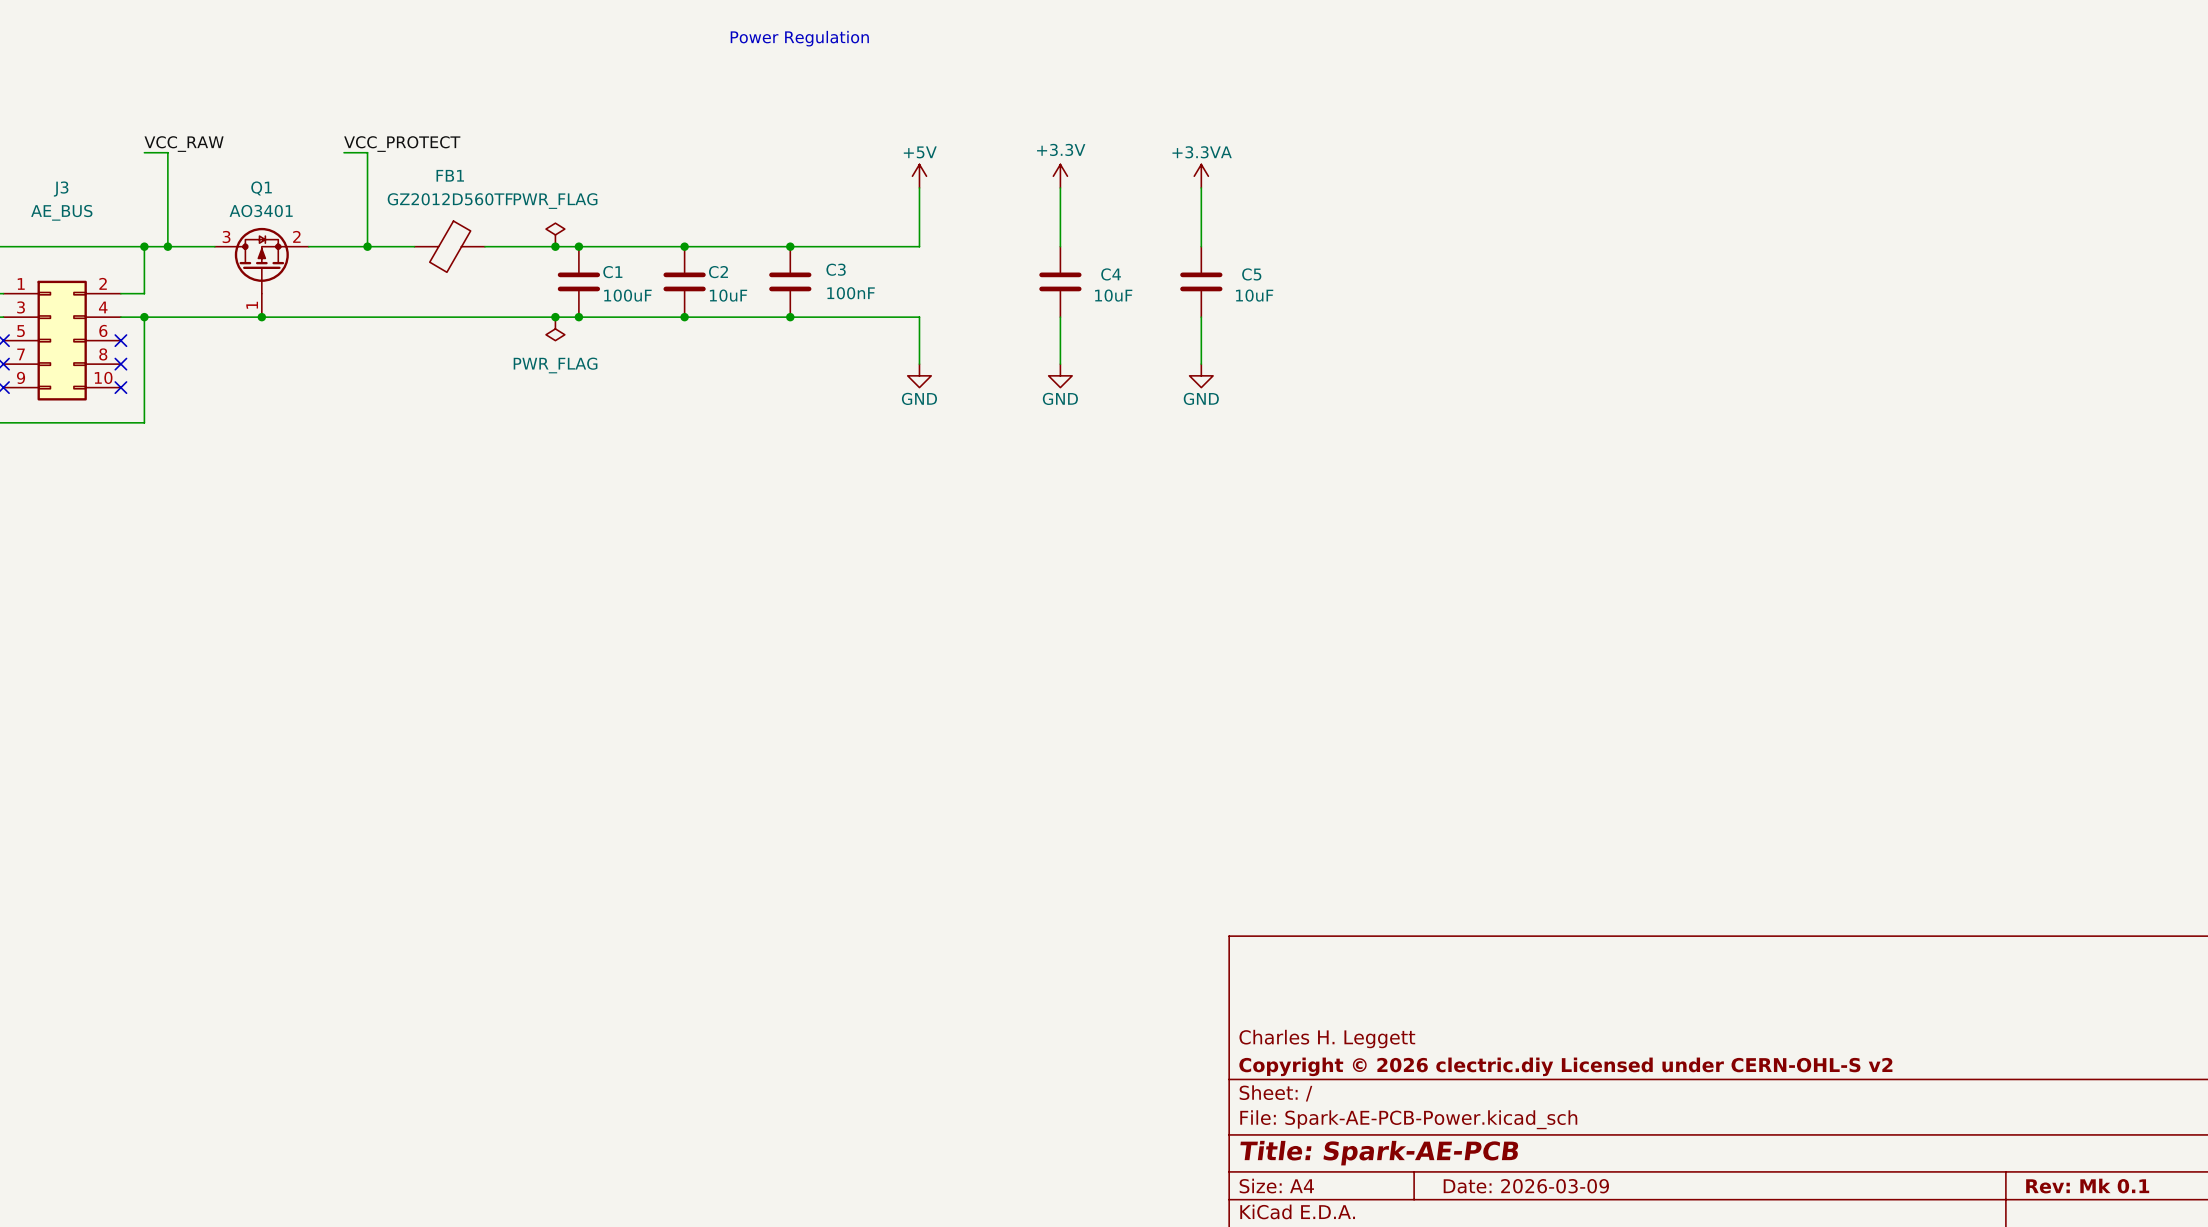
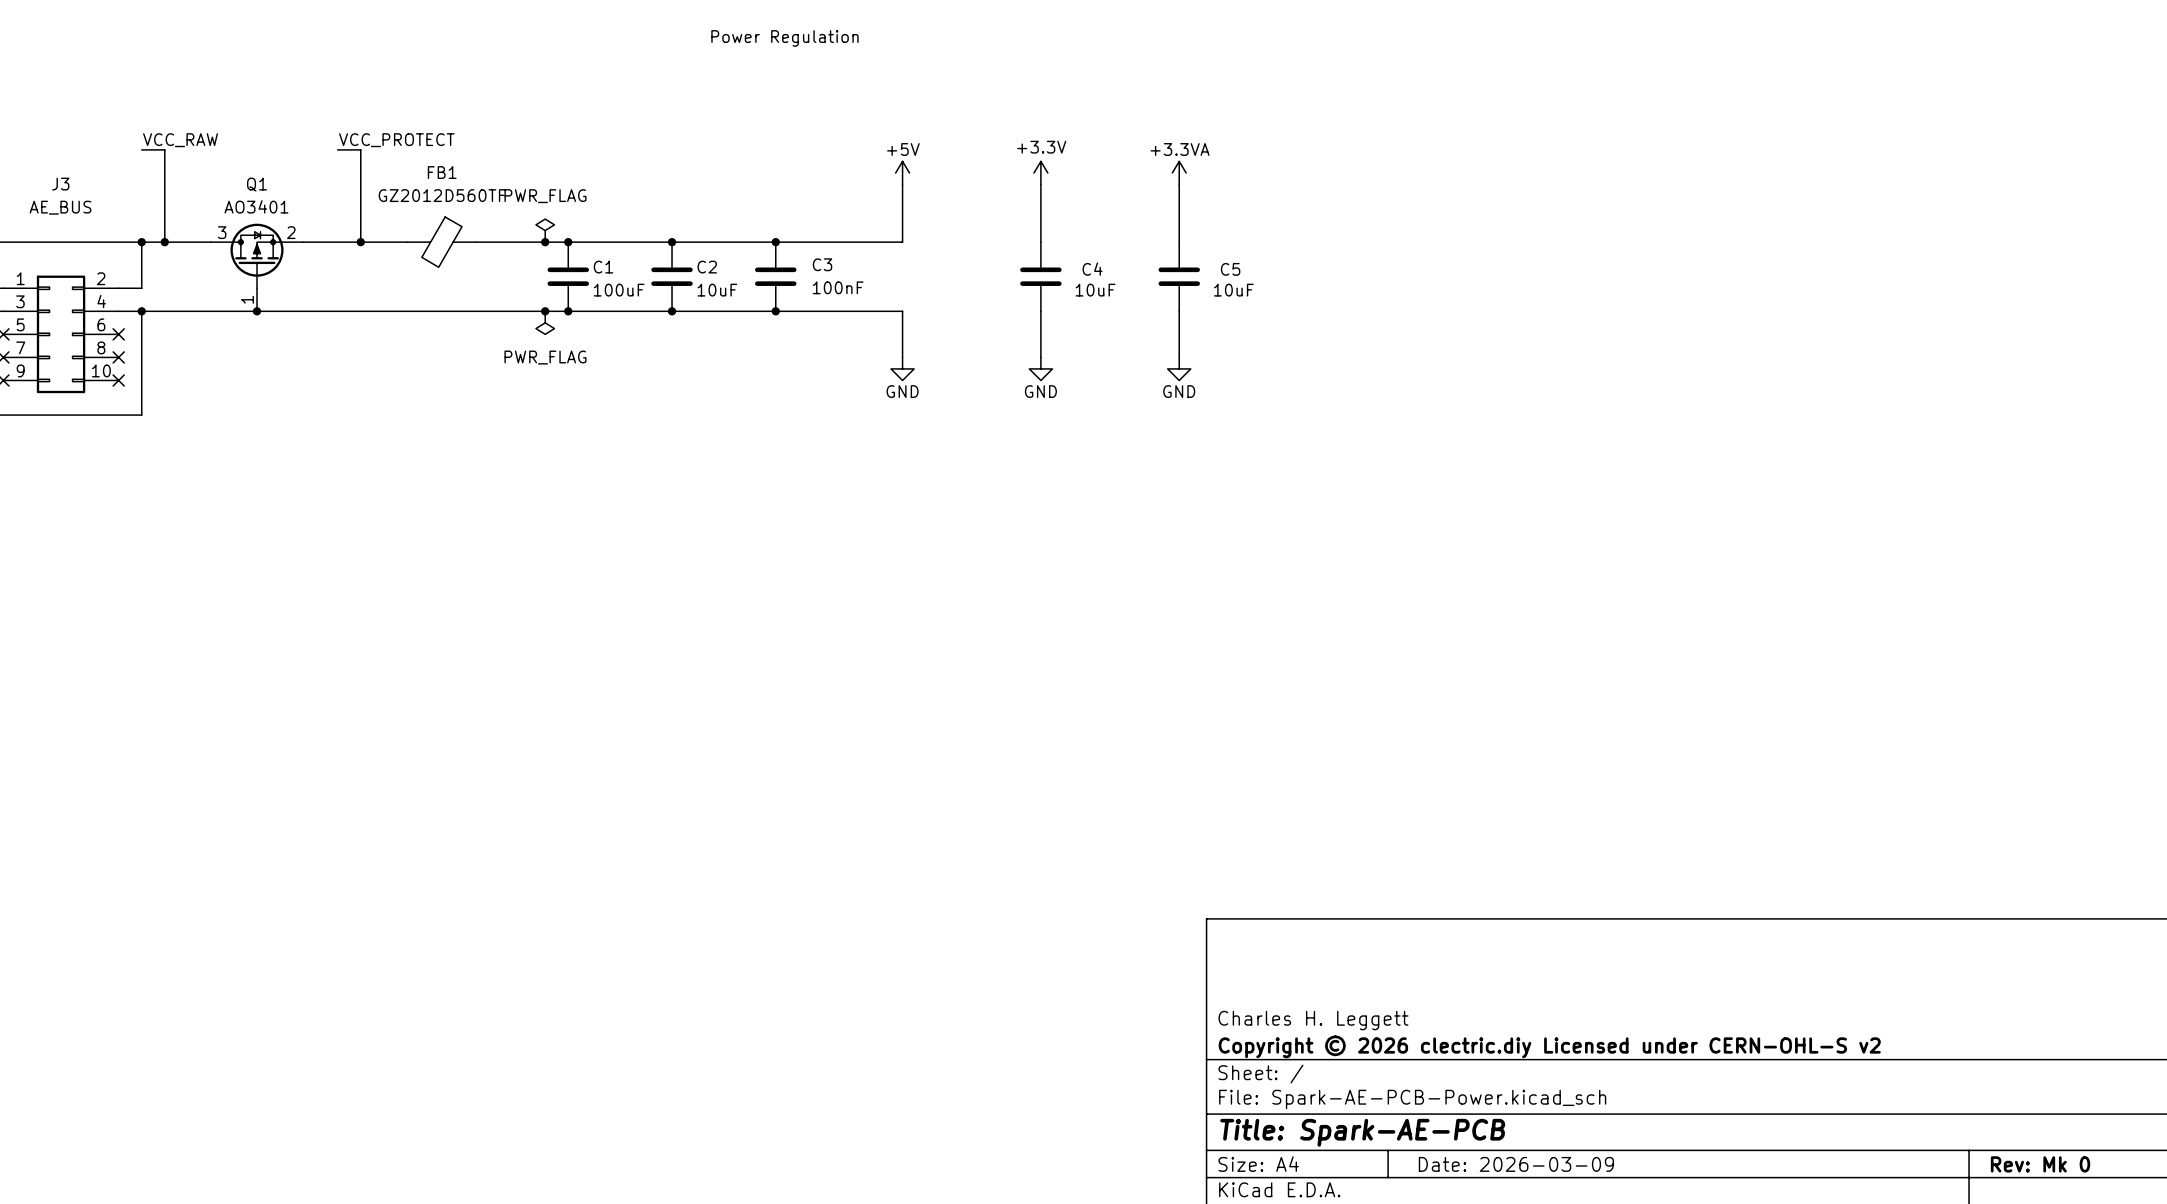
title block: Rev: Mk 0.1 (2087, 1186) -> Rev: Mk 0 (2040, 1164)

